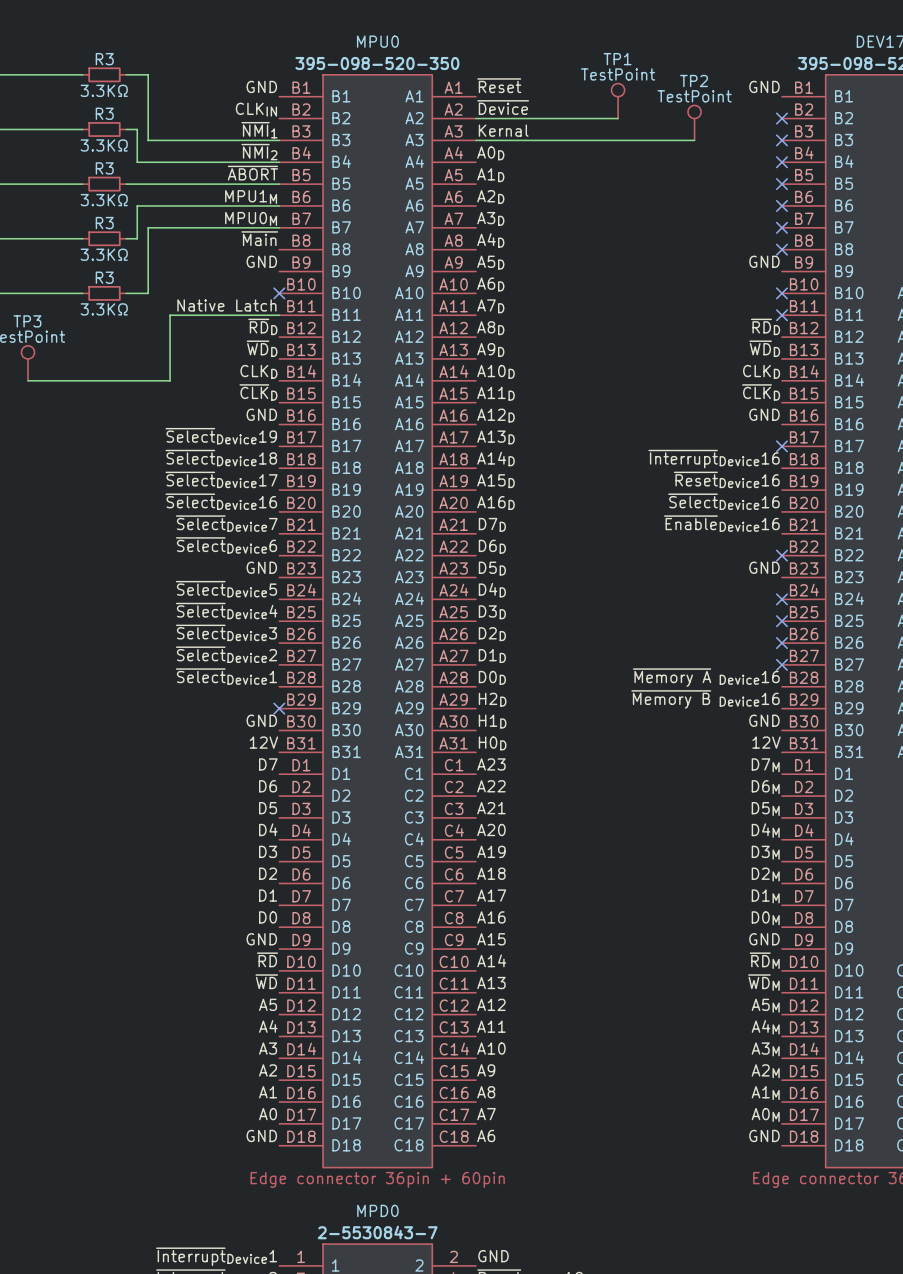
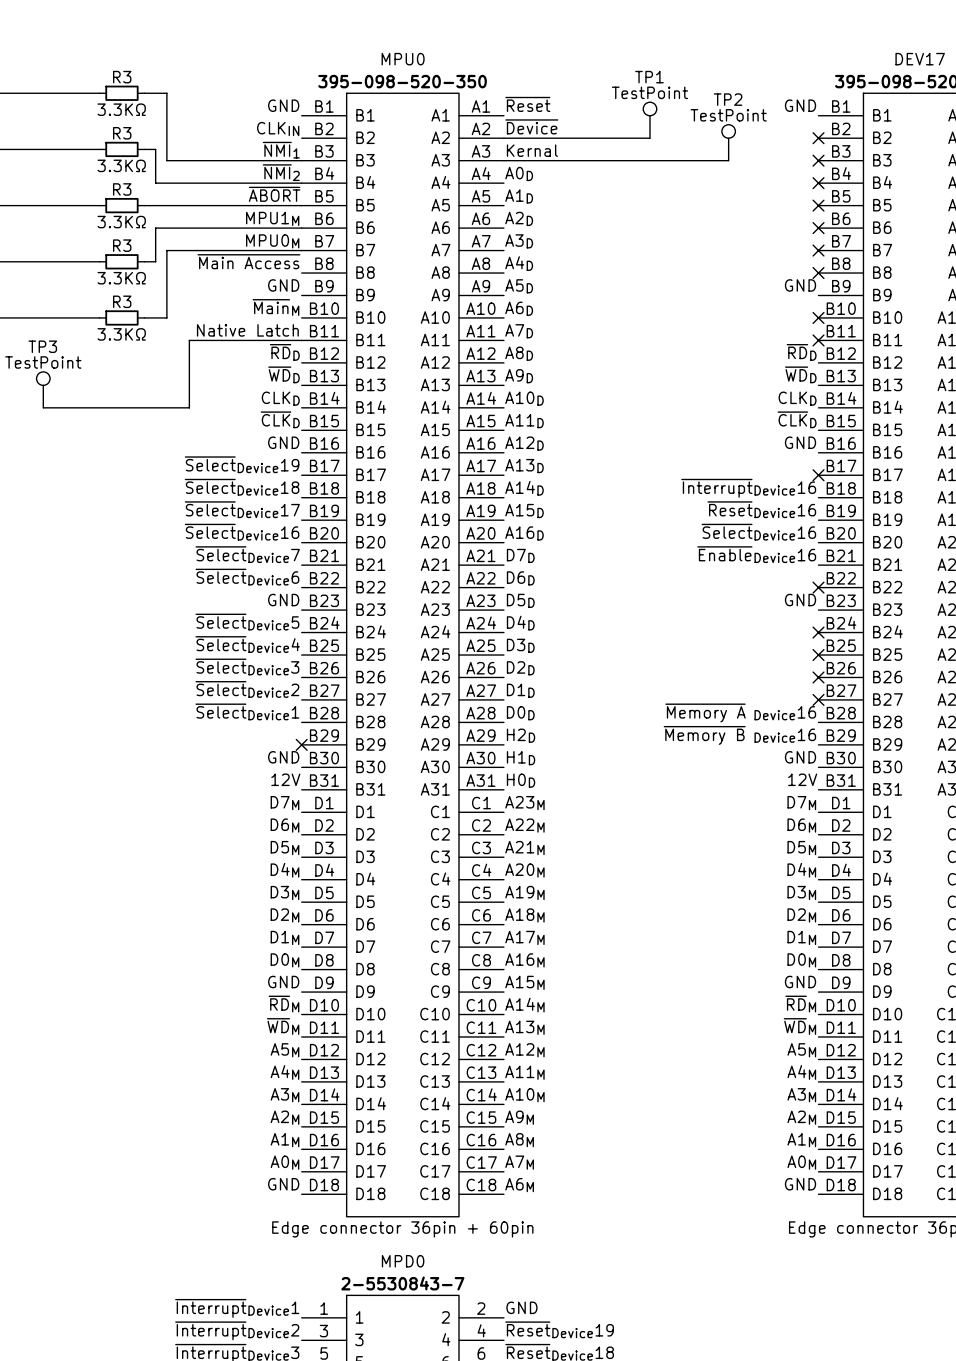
label: ~{Main} (259, 238) -> ~{Main Access} (248, 261)
label: none -> ~{Main}M (275, 307)
no-connect mark: (279, 293) -> none
label: D7 (268, 764) -> D7M (284, 803)
label: A23 (491, 764) -> A23M (524, 803)
label: D6 (268, 786) -> D6M (284, 825)
label: A22 (491, 786) -> A22M (524, 825)
label: D5 (268, 808) -> D5M (284, 848)
label: A21 (491, 808) -> A21M (524, 848)
label: D4 (268, 829) -> D4M (284, 870)
label: A20 (491, 830) -> A20M (524, 870)
label: D3 (268, 851) -> D3M (284, 892)
label: A19 (491, 851) -> A19M (524, 892)
label: D2 (268, 873) -> D2M (284, 915)
label: A18 (491, 873) -> A18M (524, 915)
label: D1 (268, 895) -> D1M (284, 937)
label: A17 (491, 895) -> A17M (524, 937)
label: D0 (268, 917) -> D0M (284, 960)
label: A16 (491, 917) -> A16M (524, 960)
label: A15 (491, 939) -> A15M (524, 982)
label: ~{RD} (267, 959) -> ~{RD}M (283, 1004)
label: A14 (491, 960) -> A14M (524, 1005)
label: ~{WD} (266, 981) -> ~{WD}M (283, 1026)
label: A13 (491, 982) -> A13M (524, 1027)
label: A5 (268, 1004) -> A5M (284, 1050)
label: A12 (491, 1004) -> A12M (524, 1050)
label: A4 (268, 1026) -> A4M (284, 1072)
label: A11 (491, 1026) -> A11M (524, 1072)
label: A3 (268, 1048) -> A3M (284, 1095)
label: A10 (491, 1048) -> A10M (524, 1095)
label: A2 (268, 1070) -> A2M (284, 1117)
label: A9 (486, 1070) -> A9M (519, 1117)
label: A1 (268, 1092) -> A1M (284, 1140)
label: A8 (486, 1092) -> A8M (519, 1140)
label: A0 (268, 1114) -> A0M (284, 1162)
label: A7 (486, 1114) -> A7M (519, 1162)
label: A6 (486, 1135) -> A6M (519, 1185)

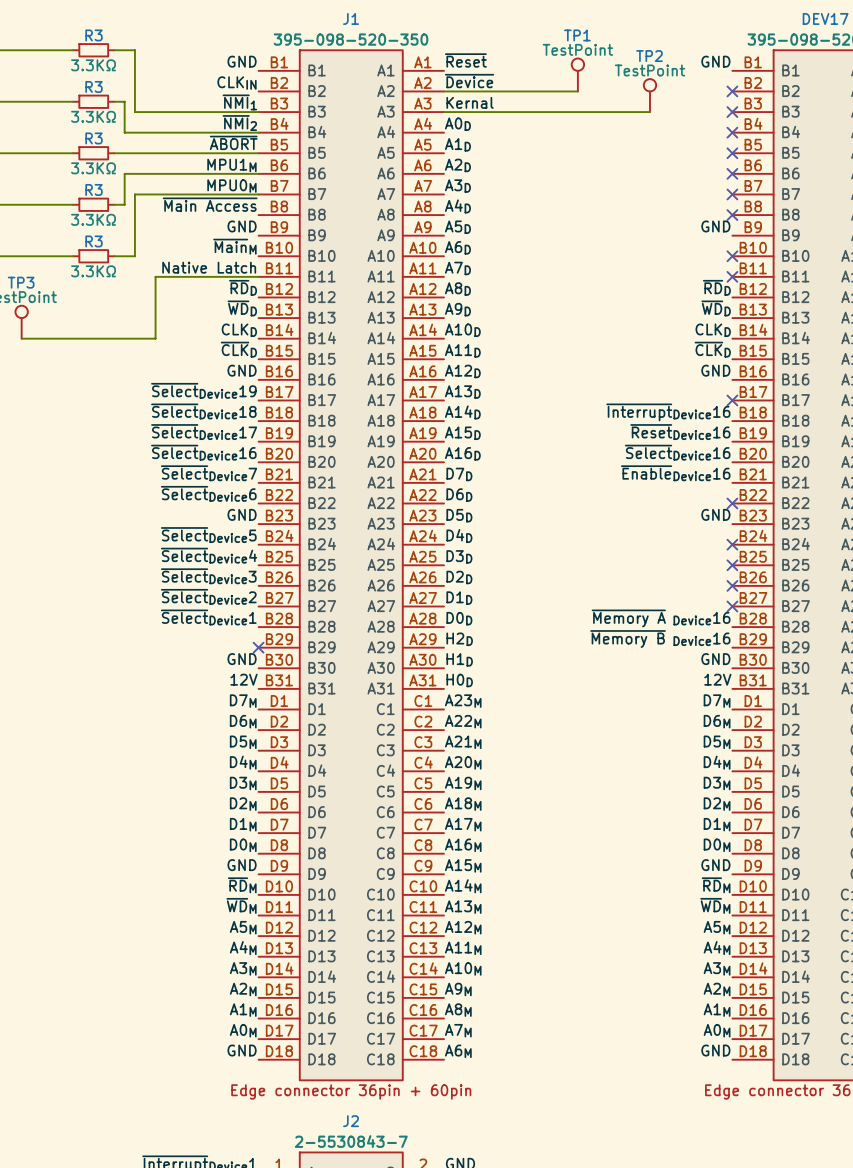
MPU0 name: MPU0 (403, 59) -> J1 (351, 18)
MPD0 name: MPD0 (403, 1261) -> J2 (351, 1121)

